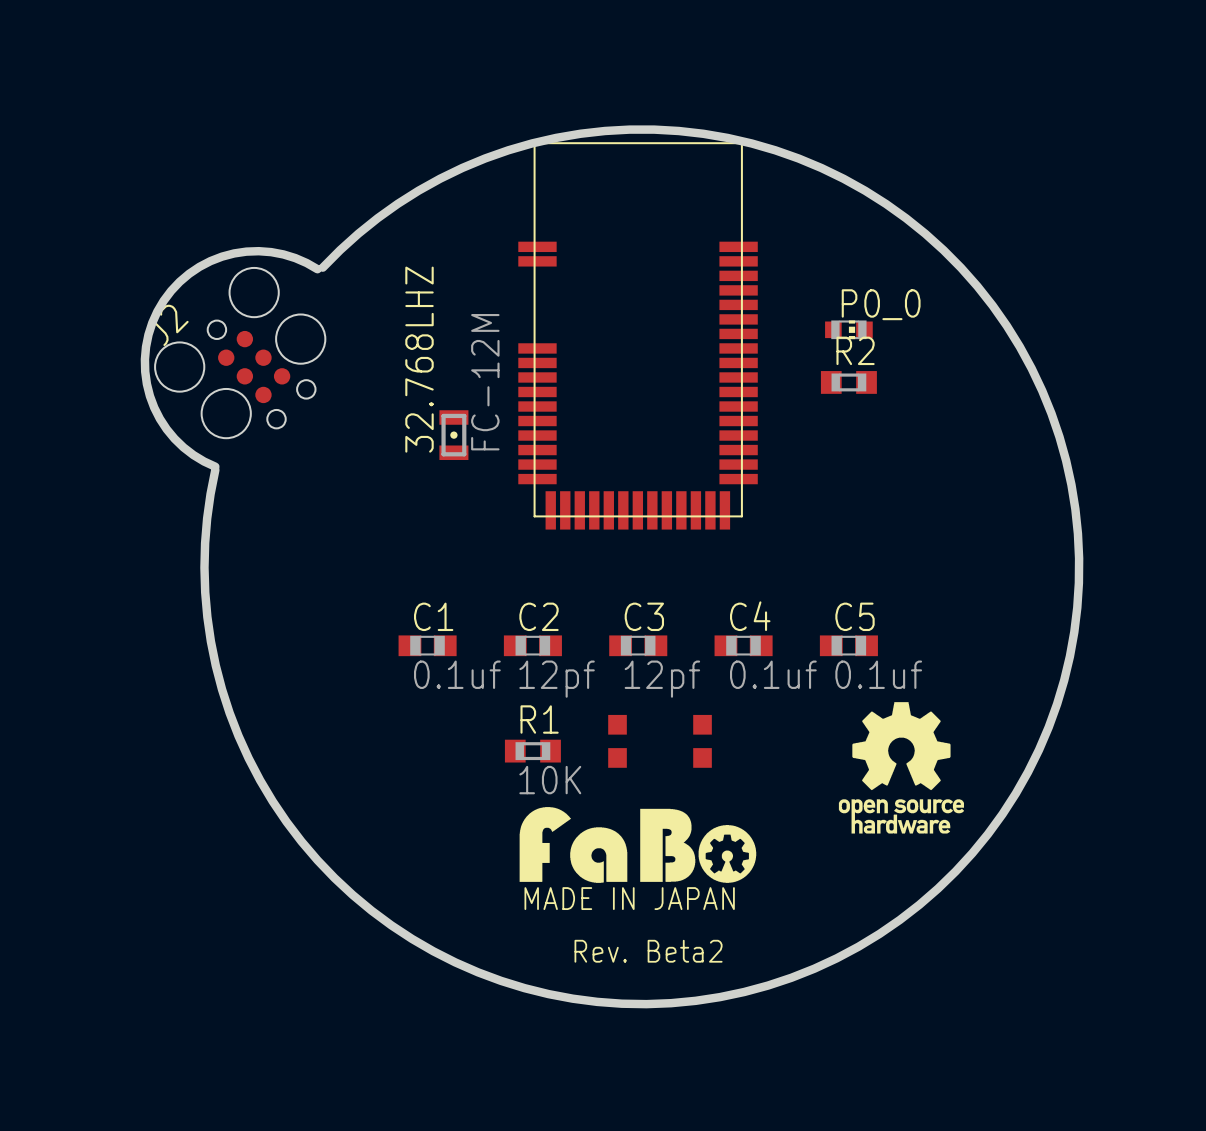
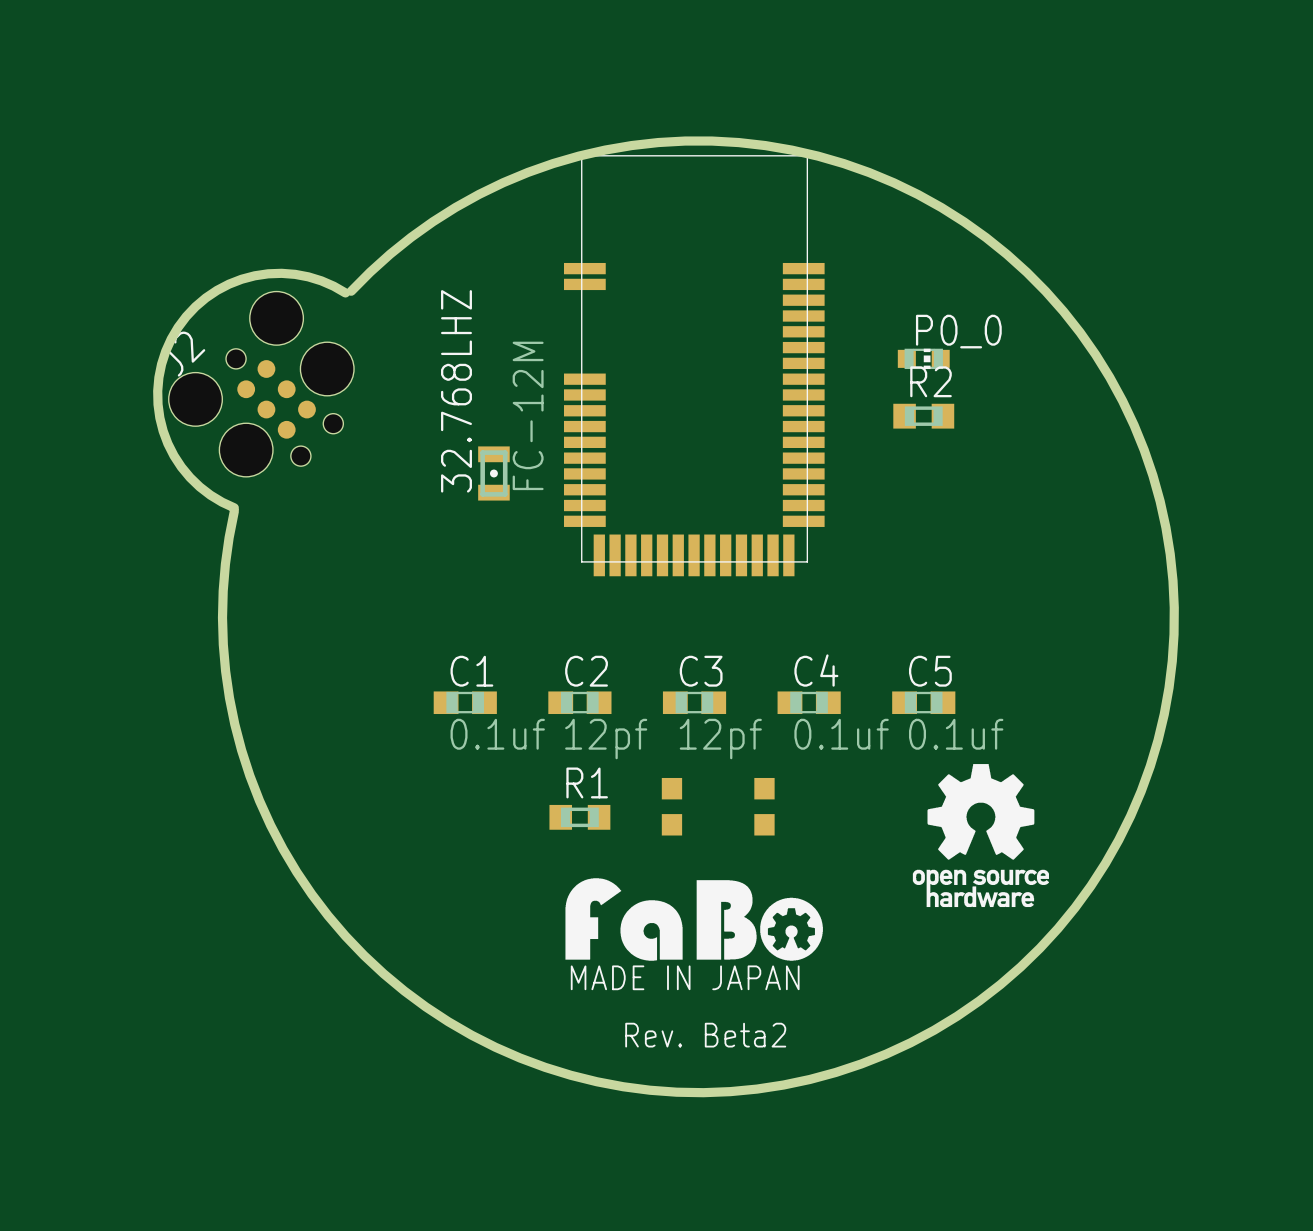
R1 value: 10K (550, 780) -> none

